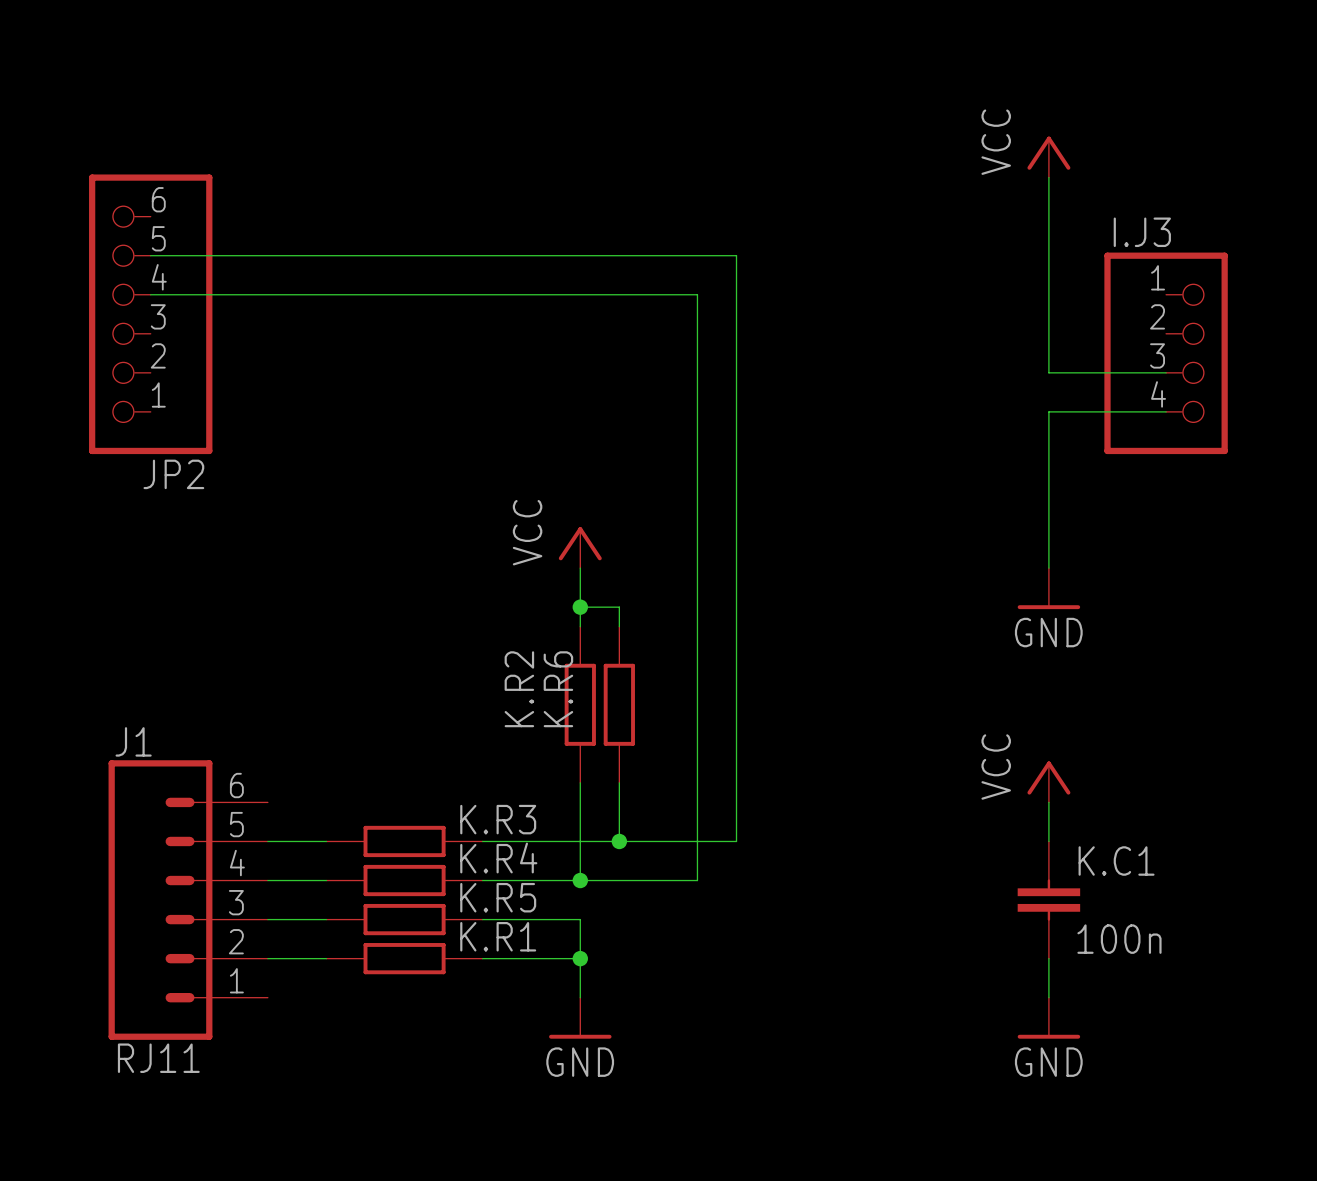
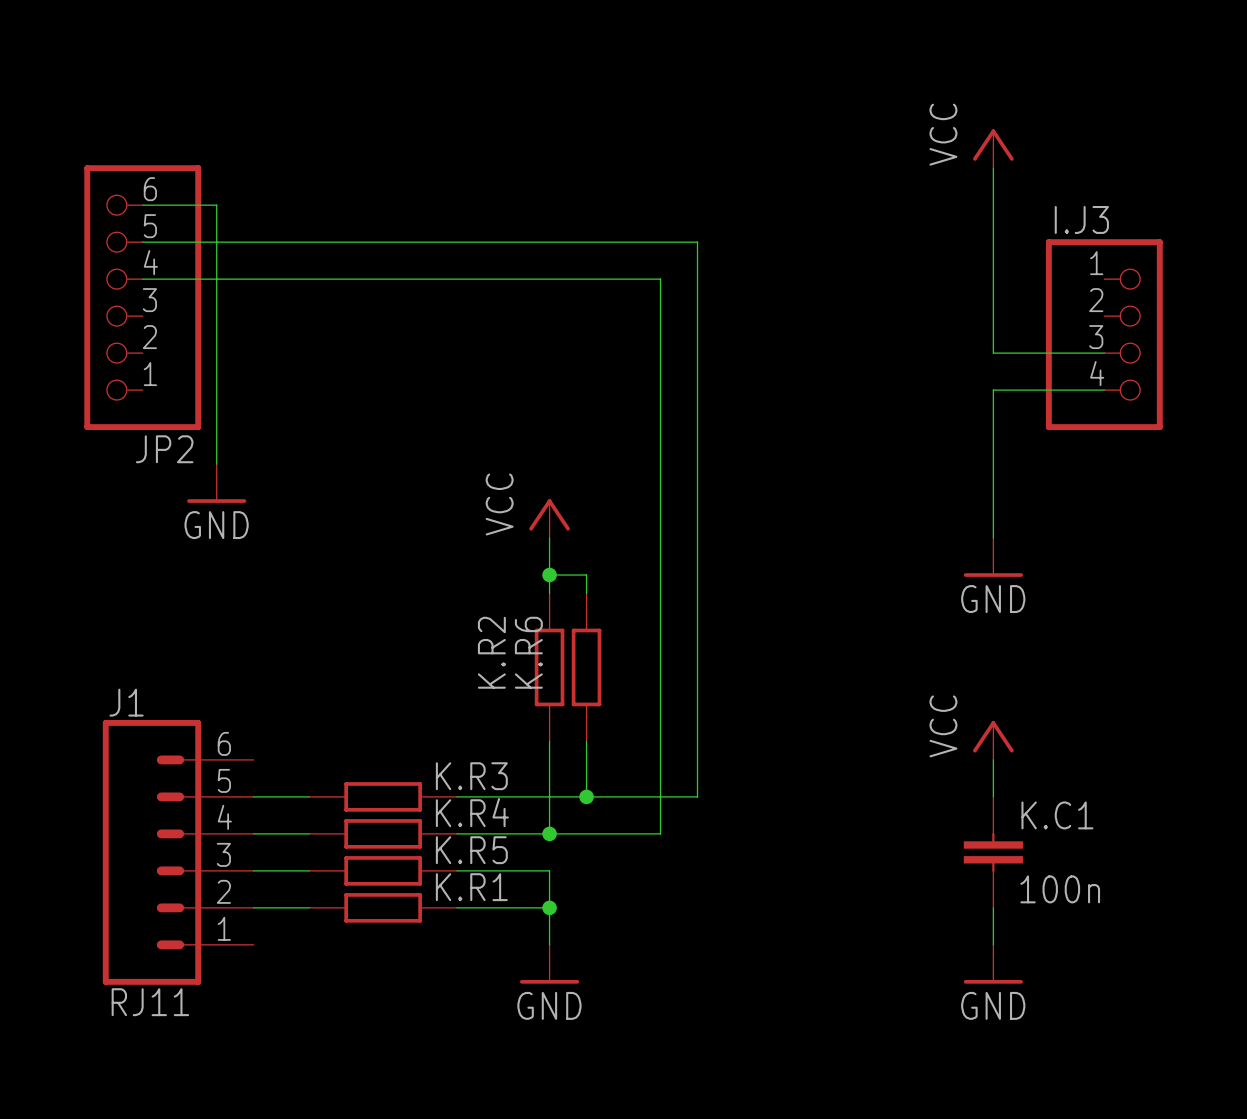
wire: none -> (142, 205) (216, 205) (216, 464)
power symbol: none -> GND (216, 483)

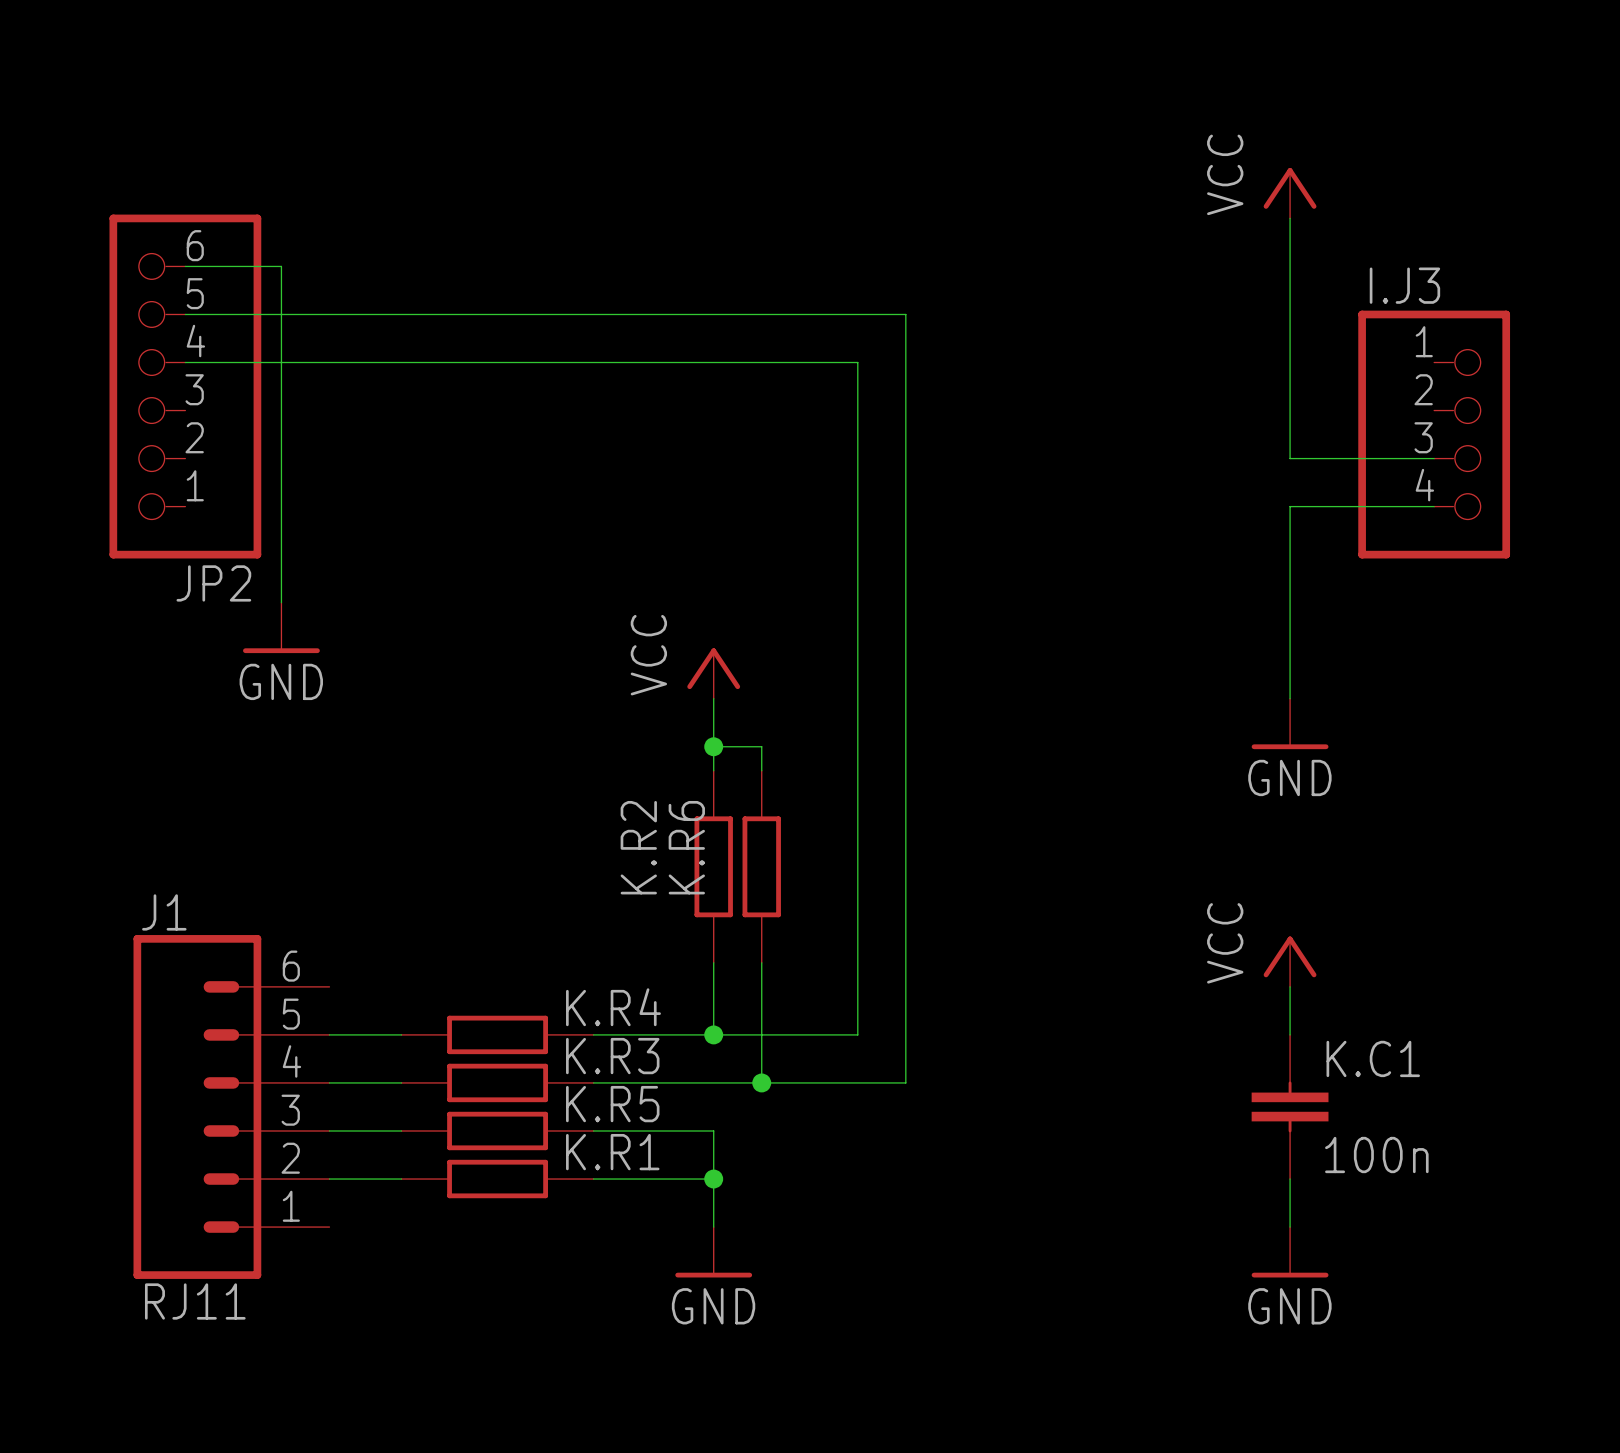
K.R3 name: K.R3 (471, 776) -> K.R4 (613, 1007)
wire: (549, 796) (549, 833) -> (761, 1034) (761, 1082)
junction: none -> (713, 1034)
junction: (586, 796) -> none
wire: (697, 796) (660, 796) (660, 833) -> (905, 1034) (905, 1082) (857, 1082)
K.R4 name: K.R4 (472, 812) -> K.R3 (612, 1056)
junction: (549, 833) -> none
junction: none -> (761, 1082)

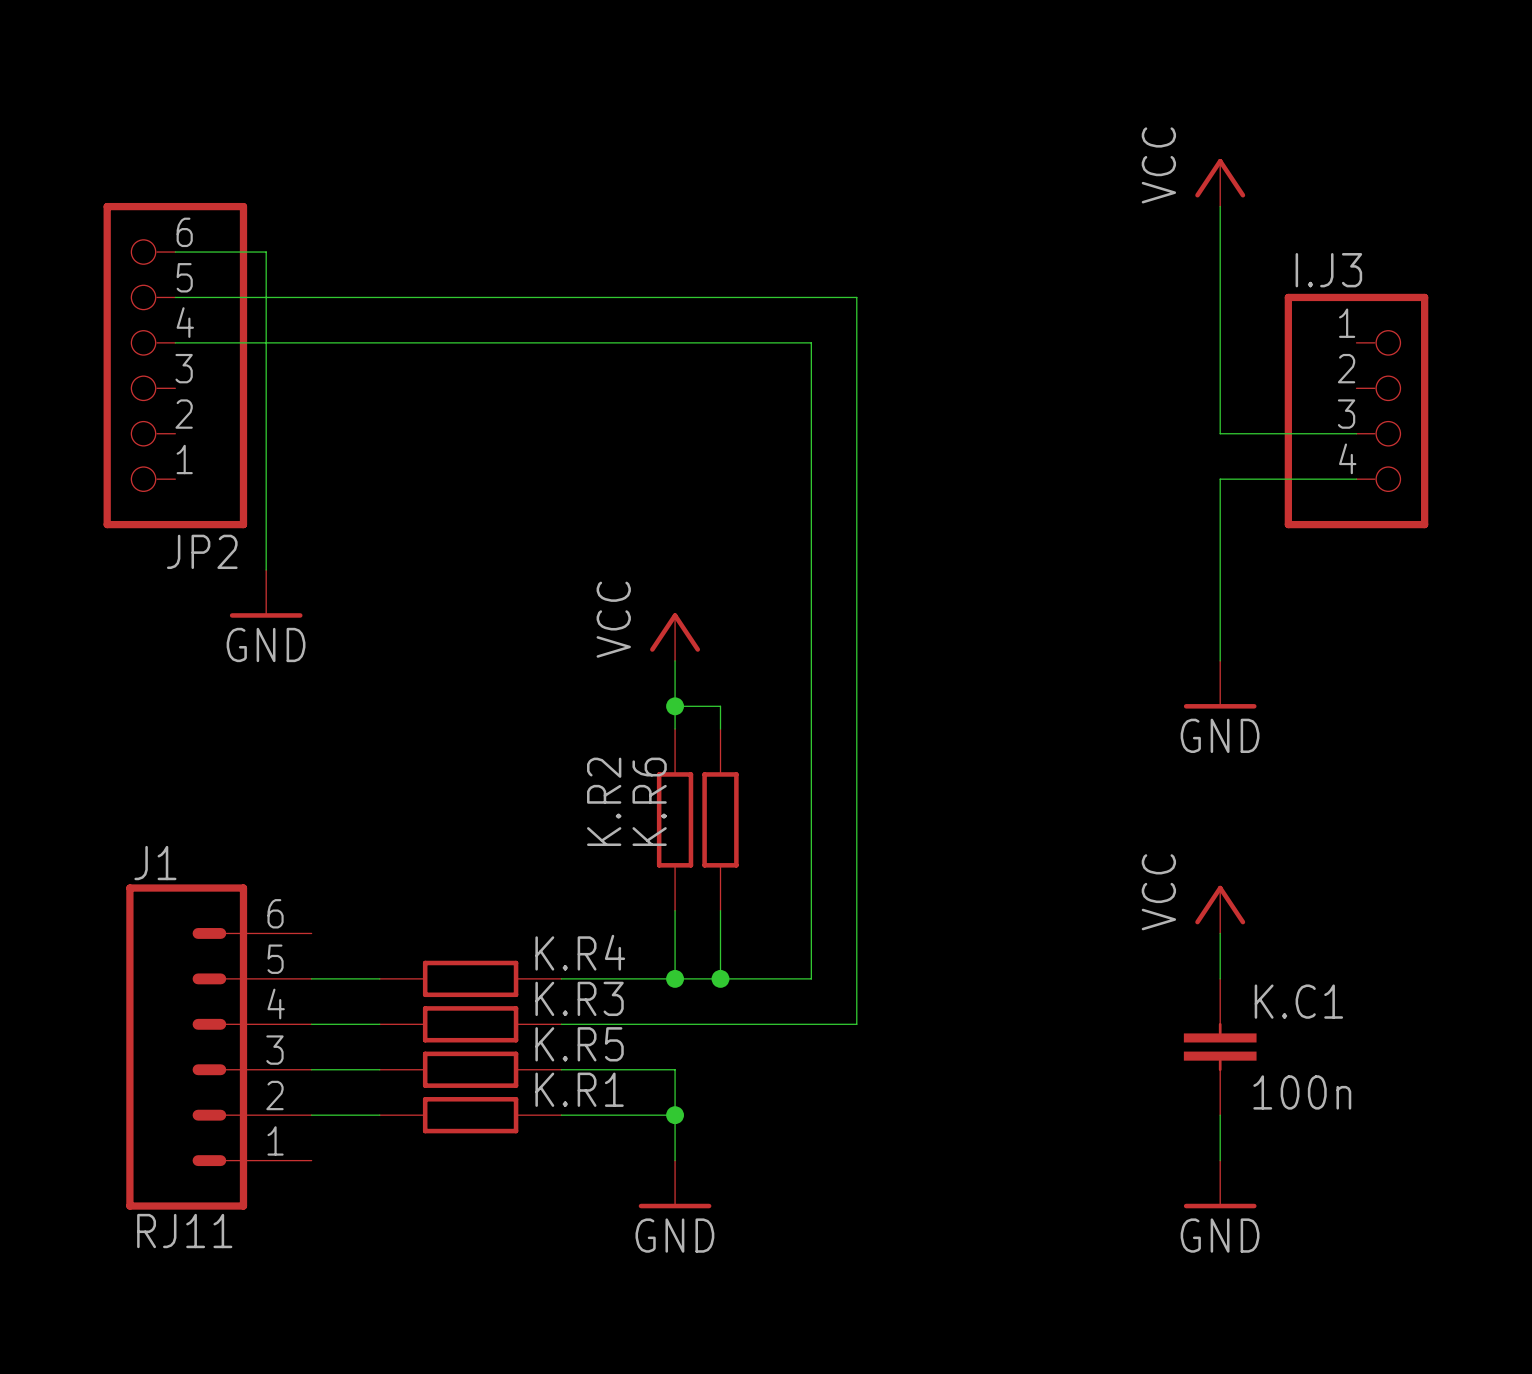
wire: (761, 1034) (761, 1082) -> none
junction position: (761, 1082) -> (720, 978)

